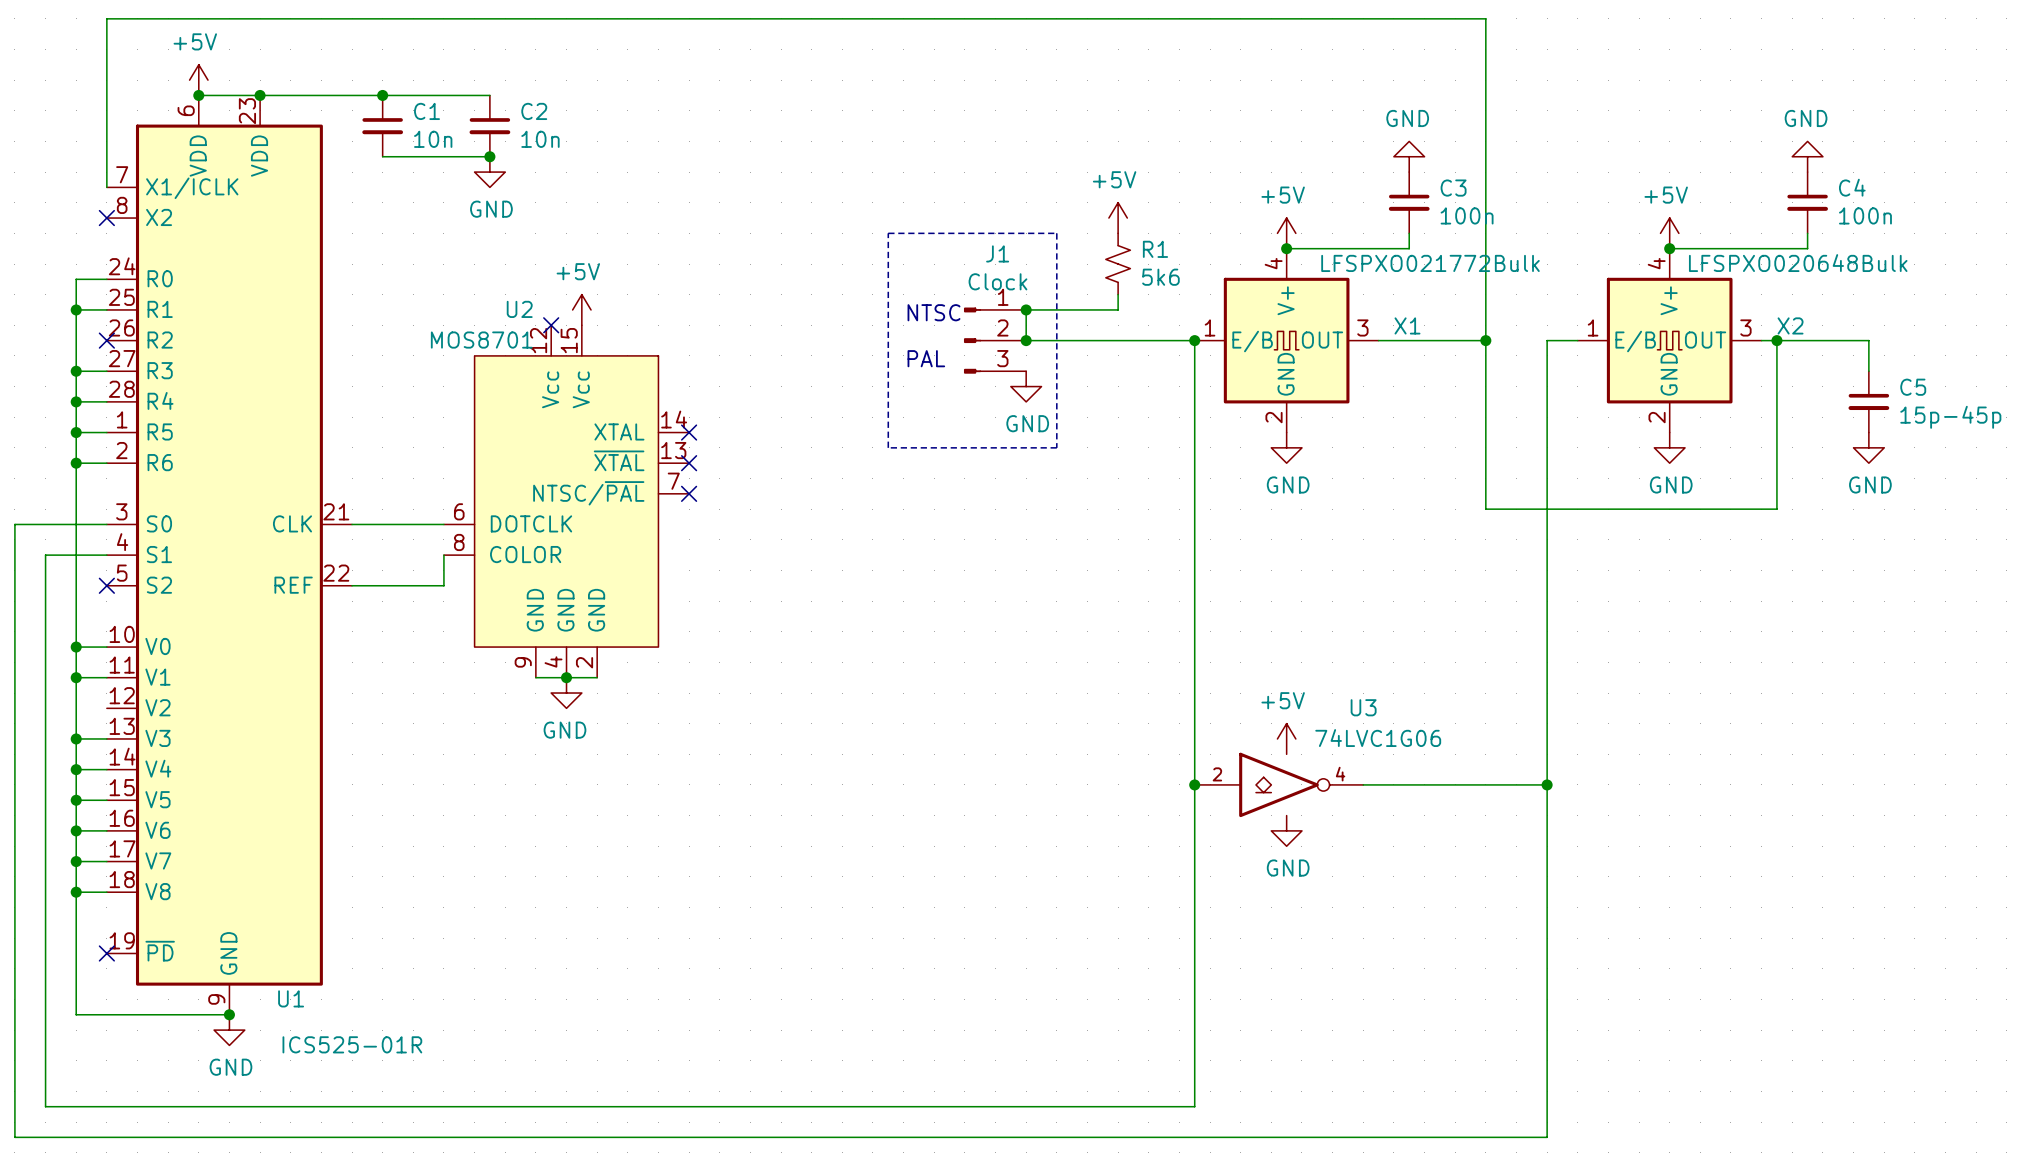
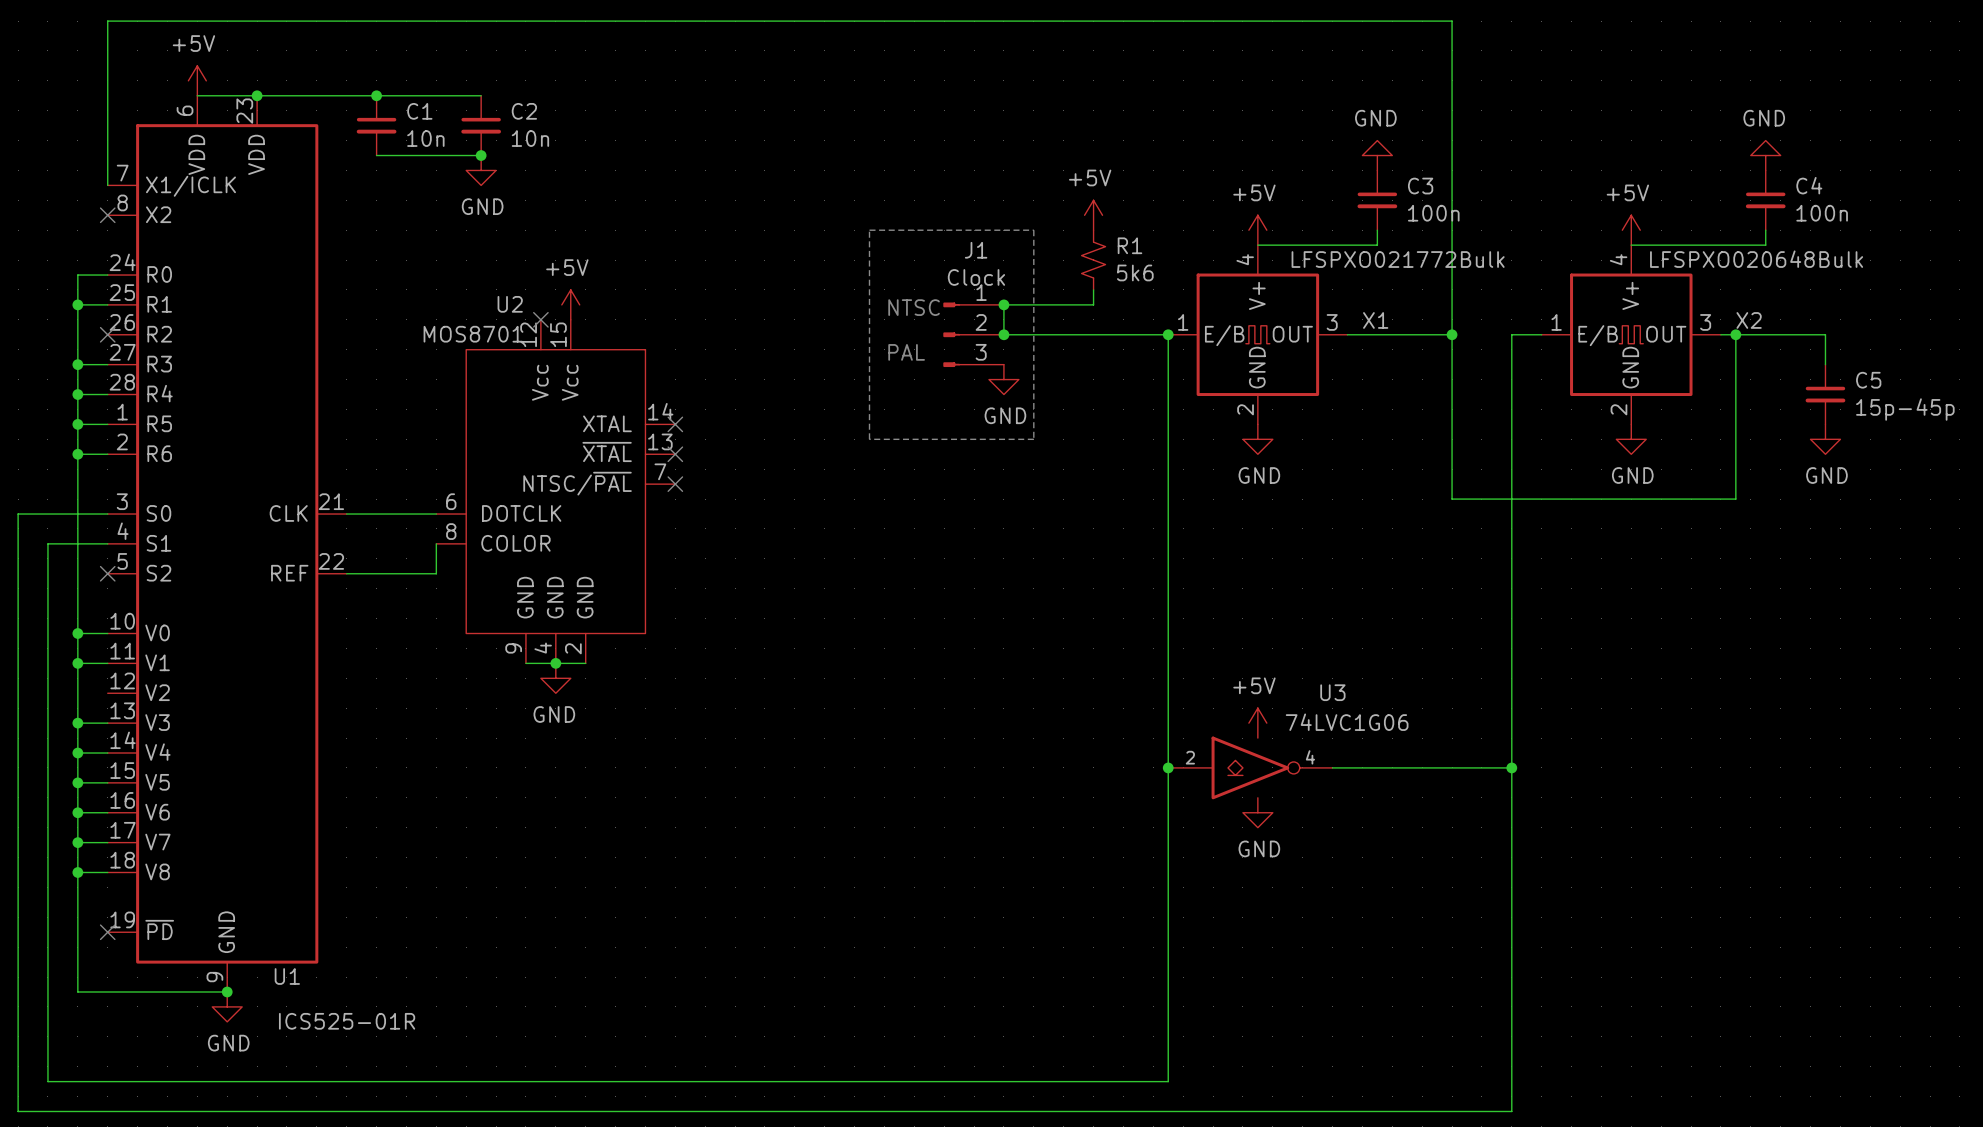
junction: (198, 95) -> none
junction: (1286, 248) -> none
junction: (1669, 248) -> none

